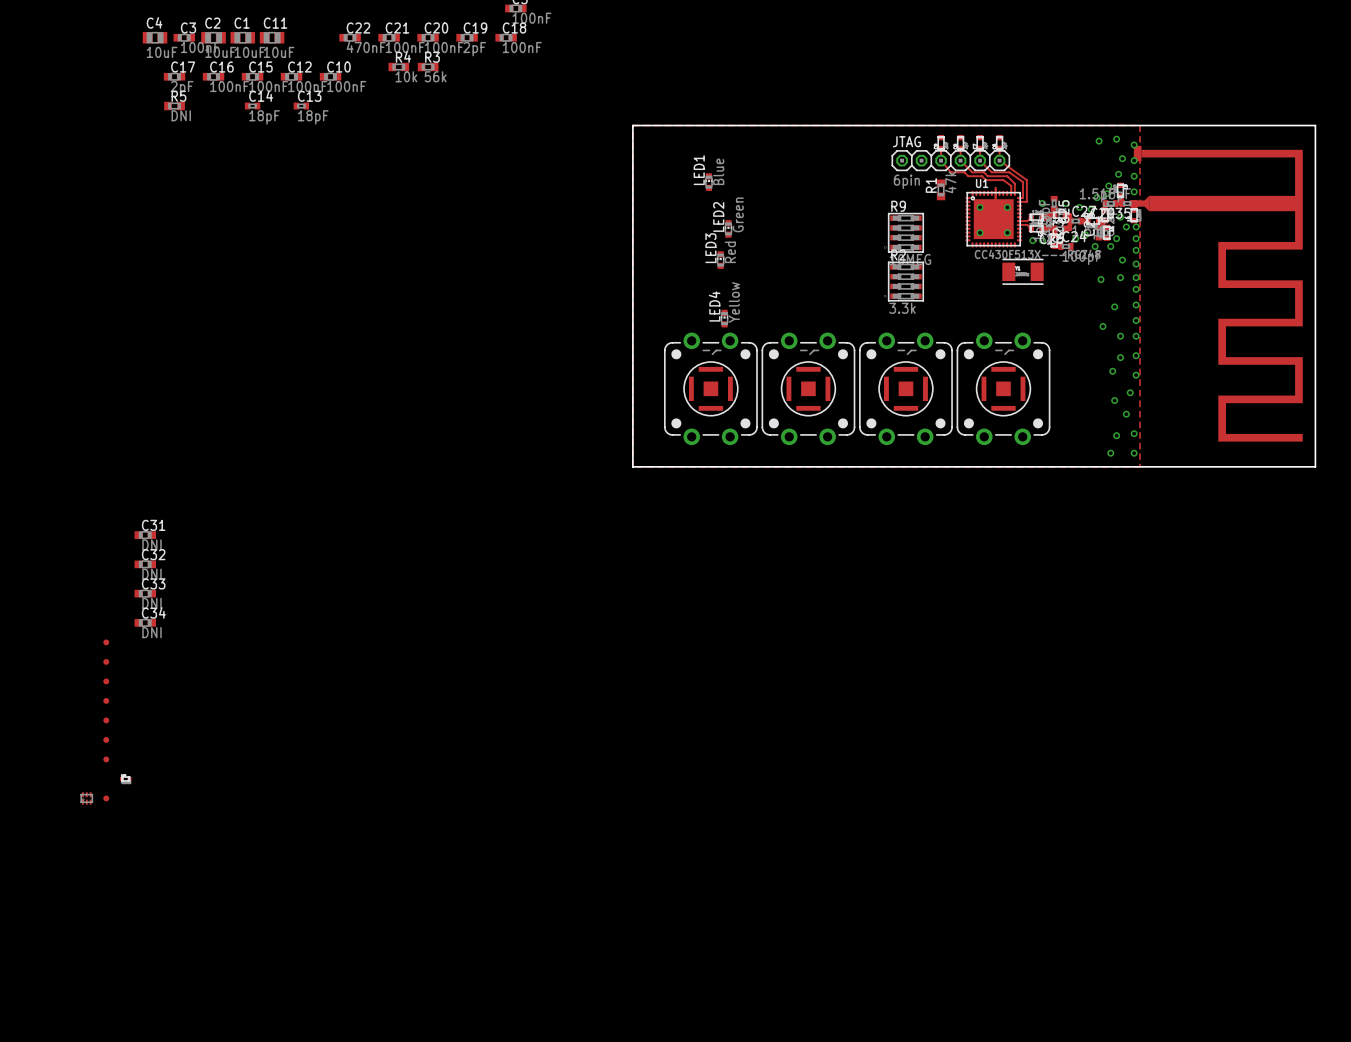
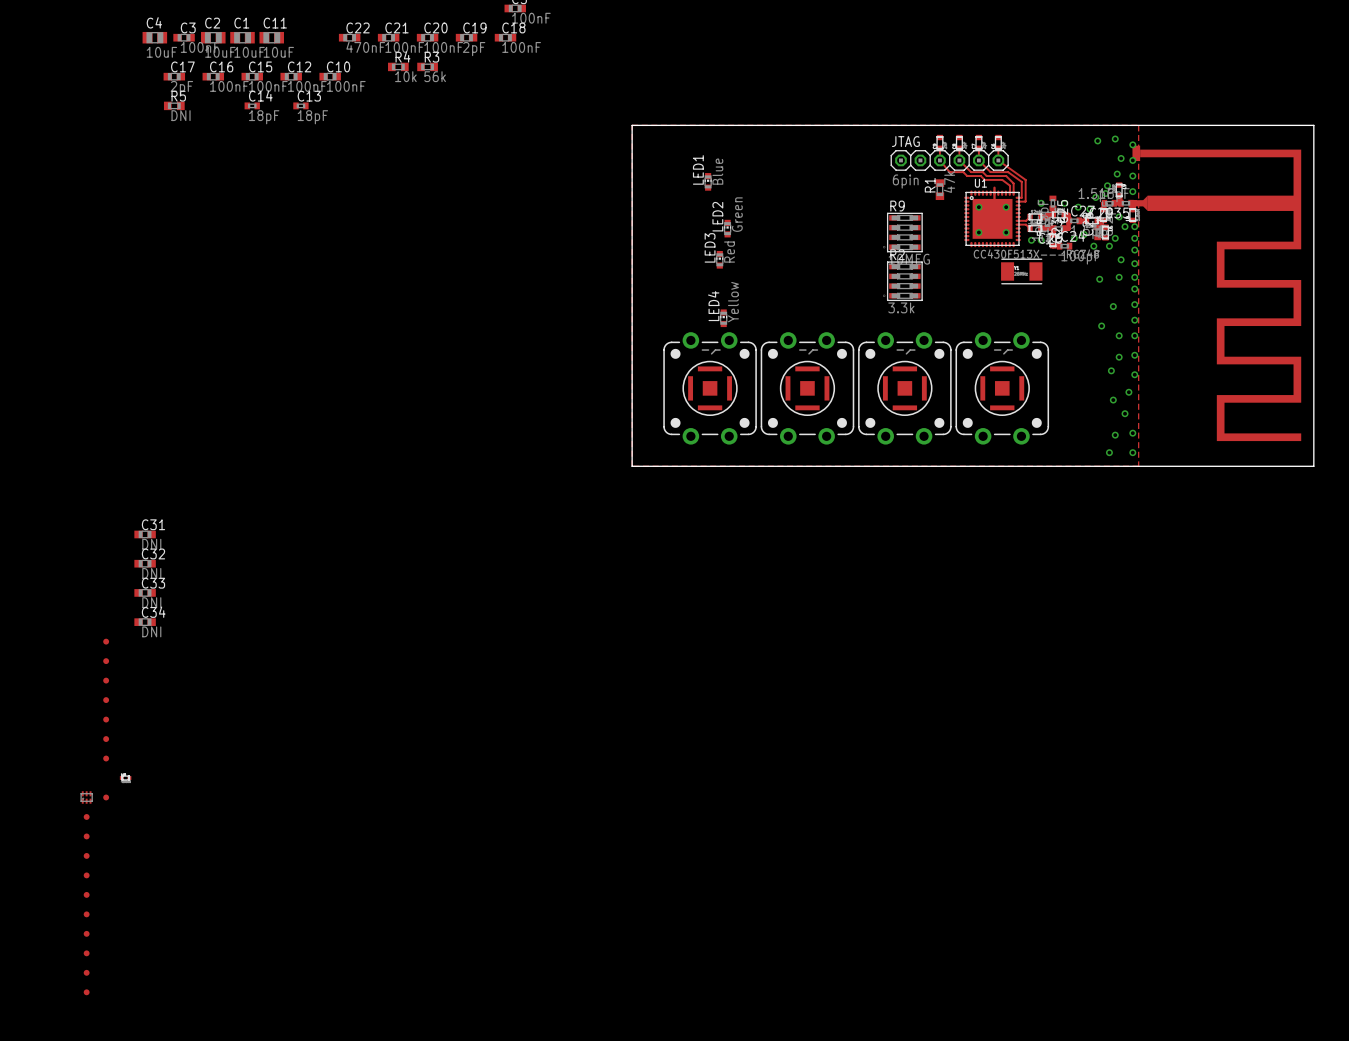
part: none -> (86, 816)
part: none -> (86, 836)
part: none -> (86, 855)
part: none -> (86, 875)
part: none -> (86, 894)
part: none -> (86, 914)
part: none -> (86, 933)
part: none -> (86, 953)
part: none -> (86, 972)
part: none -> (86, 992)

